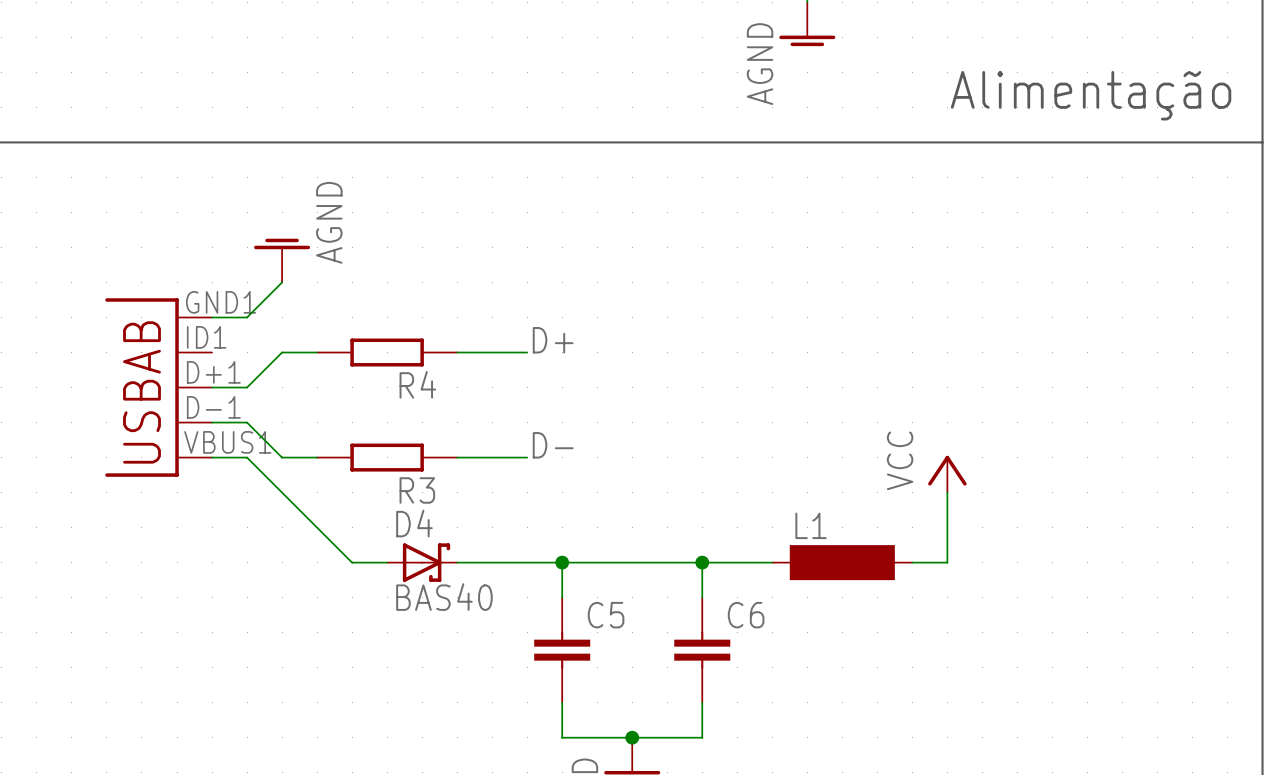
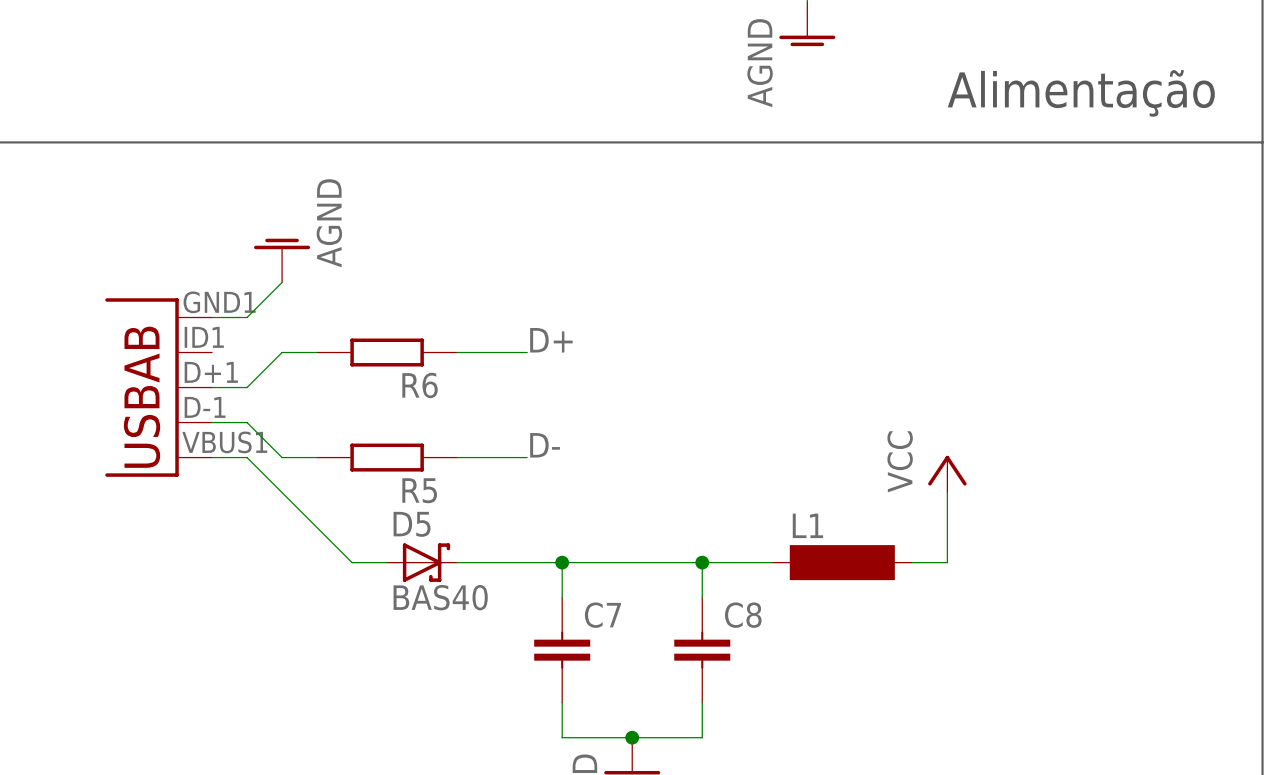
R4 name: R4 (417, 384) -> R6 (420, 385)
R3 name: R3 (417, 490) -> R5 (419, 490)
D4 name: D4 (414, 523) -> D5 (412, 524)
C5 name: C5 (606, 615) -> C7 (602, 615)
C6 name: C6 (746, 615) -> C8 (743, 615)

